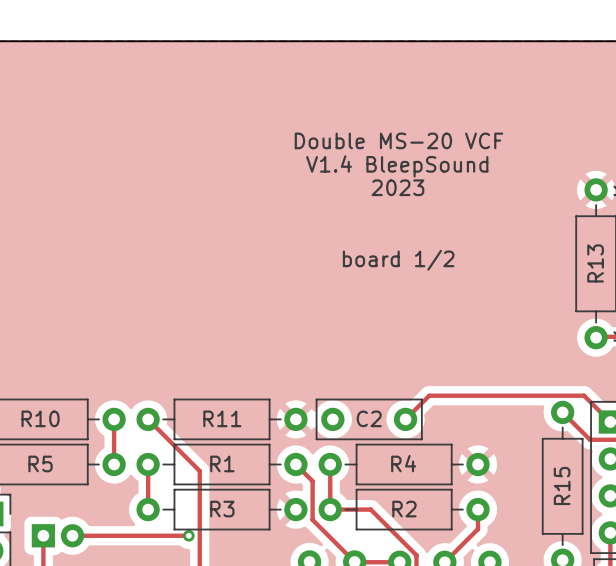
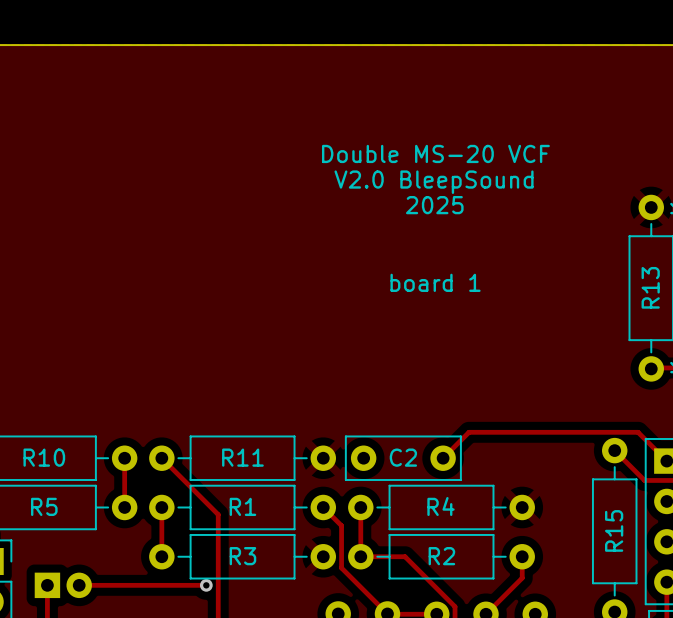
text: V1.4 BleepSound (397, 166) -> V2.0 BleepSound (434, 182)
text: 2023 (397, 187) -> 2025 (434, 205)
text: board 1/2 (398, 260) -> board 1 (435, 282)

